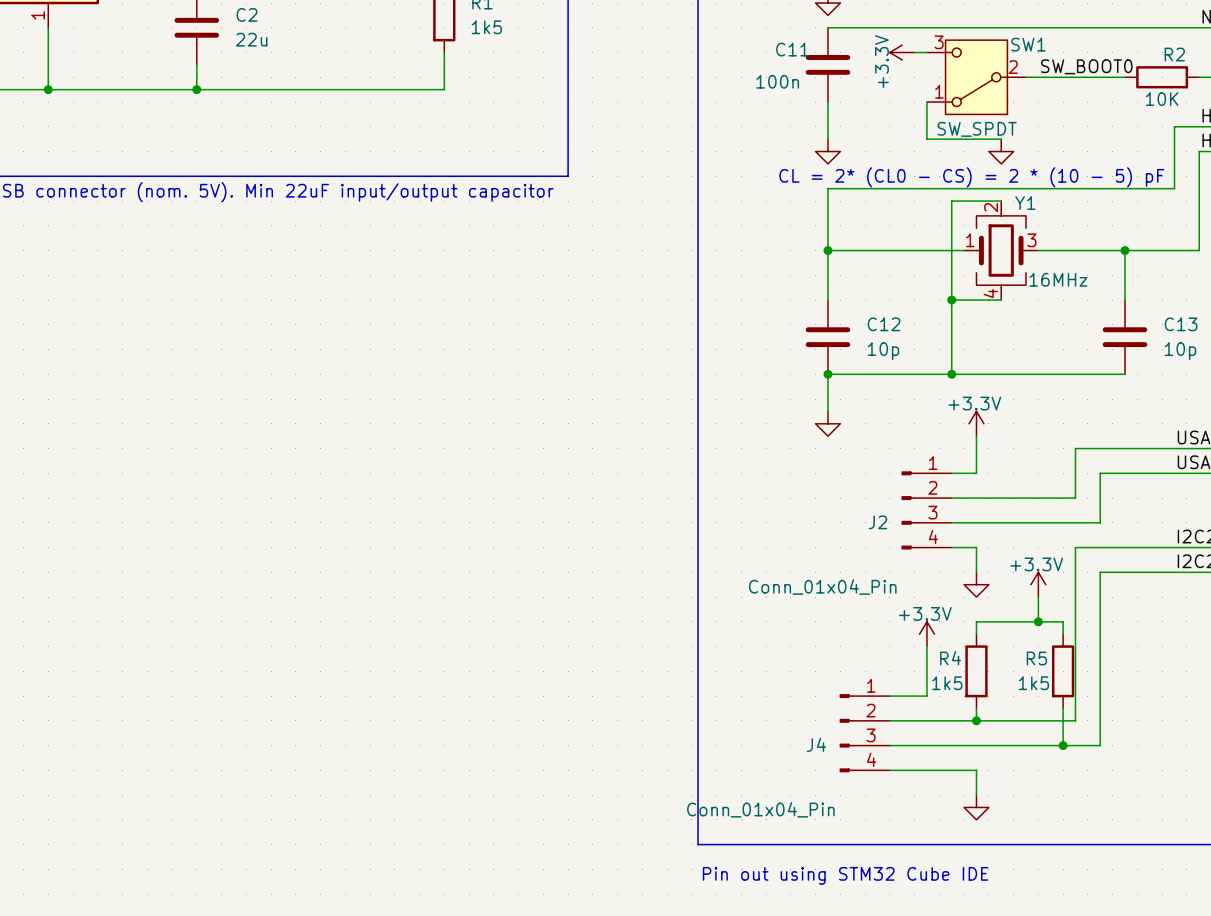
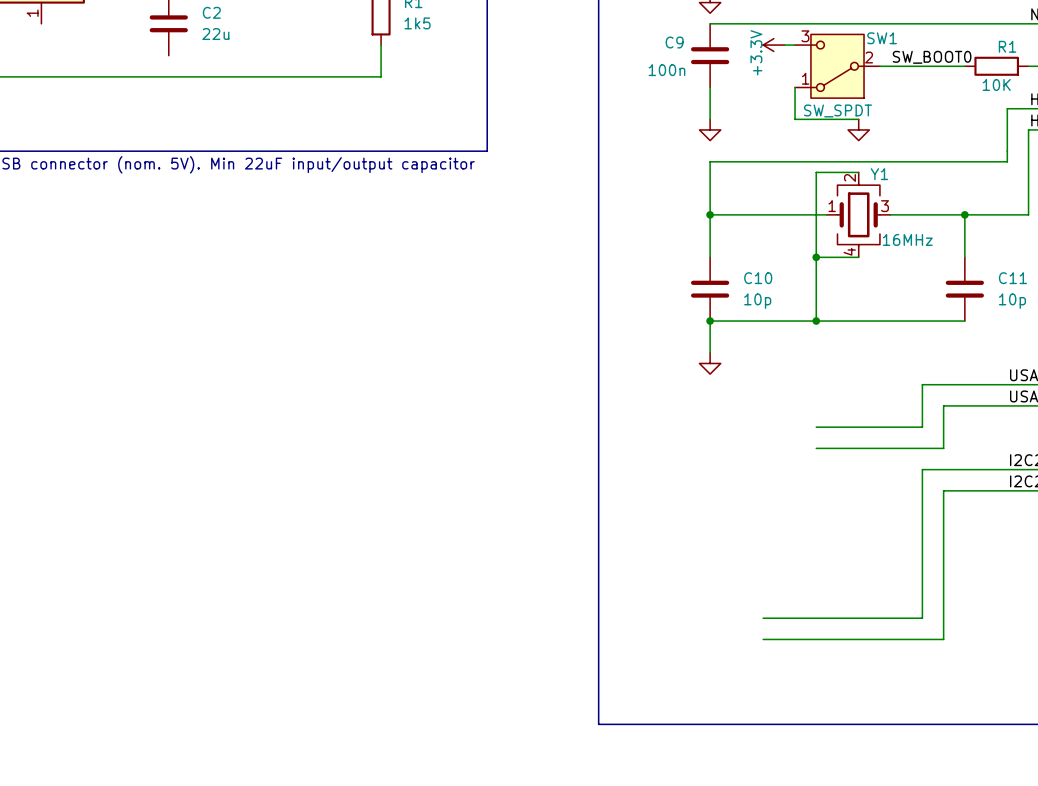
wire: (48, 27) (48, 89) -> none
C11 name: C11 (792, 49) -> C9 (674, 42)
R2 name: R2 (1174, 54) -> R1 (1007, 46)
wire: (196, 64) (196, 89) -> none
junction: (48, 89) -> none
junction: (196, 89) -> none
text: CL = 2* (CL0 - CS) = 2 * (10 - 5) pF (971, 177) -> none
C12 name: C12 (884, 324) -> C10 (758, 278)
C13 name: C13 (1181, 324) -> C11 (1012, 278)
power symbol: +3.3V (976, 423) -> none
wire: (976, 436) (976, 473) (951, 473) -> none
J2: Conn_01x04_Pin (926, 510) -> none
wire: (951, 547) (976, 547) (976, 572) -> none
power symbol: (976, 584) -> none
power symbol: +3.3V (1038, 584) -> none
wire: (1038, 597) (1038, 621) -> none
junction: (1038, 621) -> none
power symbol: +3.3V (926, 634) -> none
wire: (976, 634) (976, 621) (1063, 621) (1063, 634) -> none
wire: (926, 646) (926, 696) (889, 696) -> none
R4: 1k5 (976, 671) -> none
R5: 1k5 (1063, 671) -> none
wire: (976, 708) (976, 720) -> none
wire: (1063, 708) (1063, 745) -> none
junction: (976, 720) -> none
J4: Conn_01x04_Pin (864, 733) -> none
junction: (1063, 745) -> none
wire: (889, 770) (976, 770) (976, 795) -> none
power symbol: (976, 807) -> none
text: Pin out using STM32 Cube IDE (845, 875) -> none

